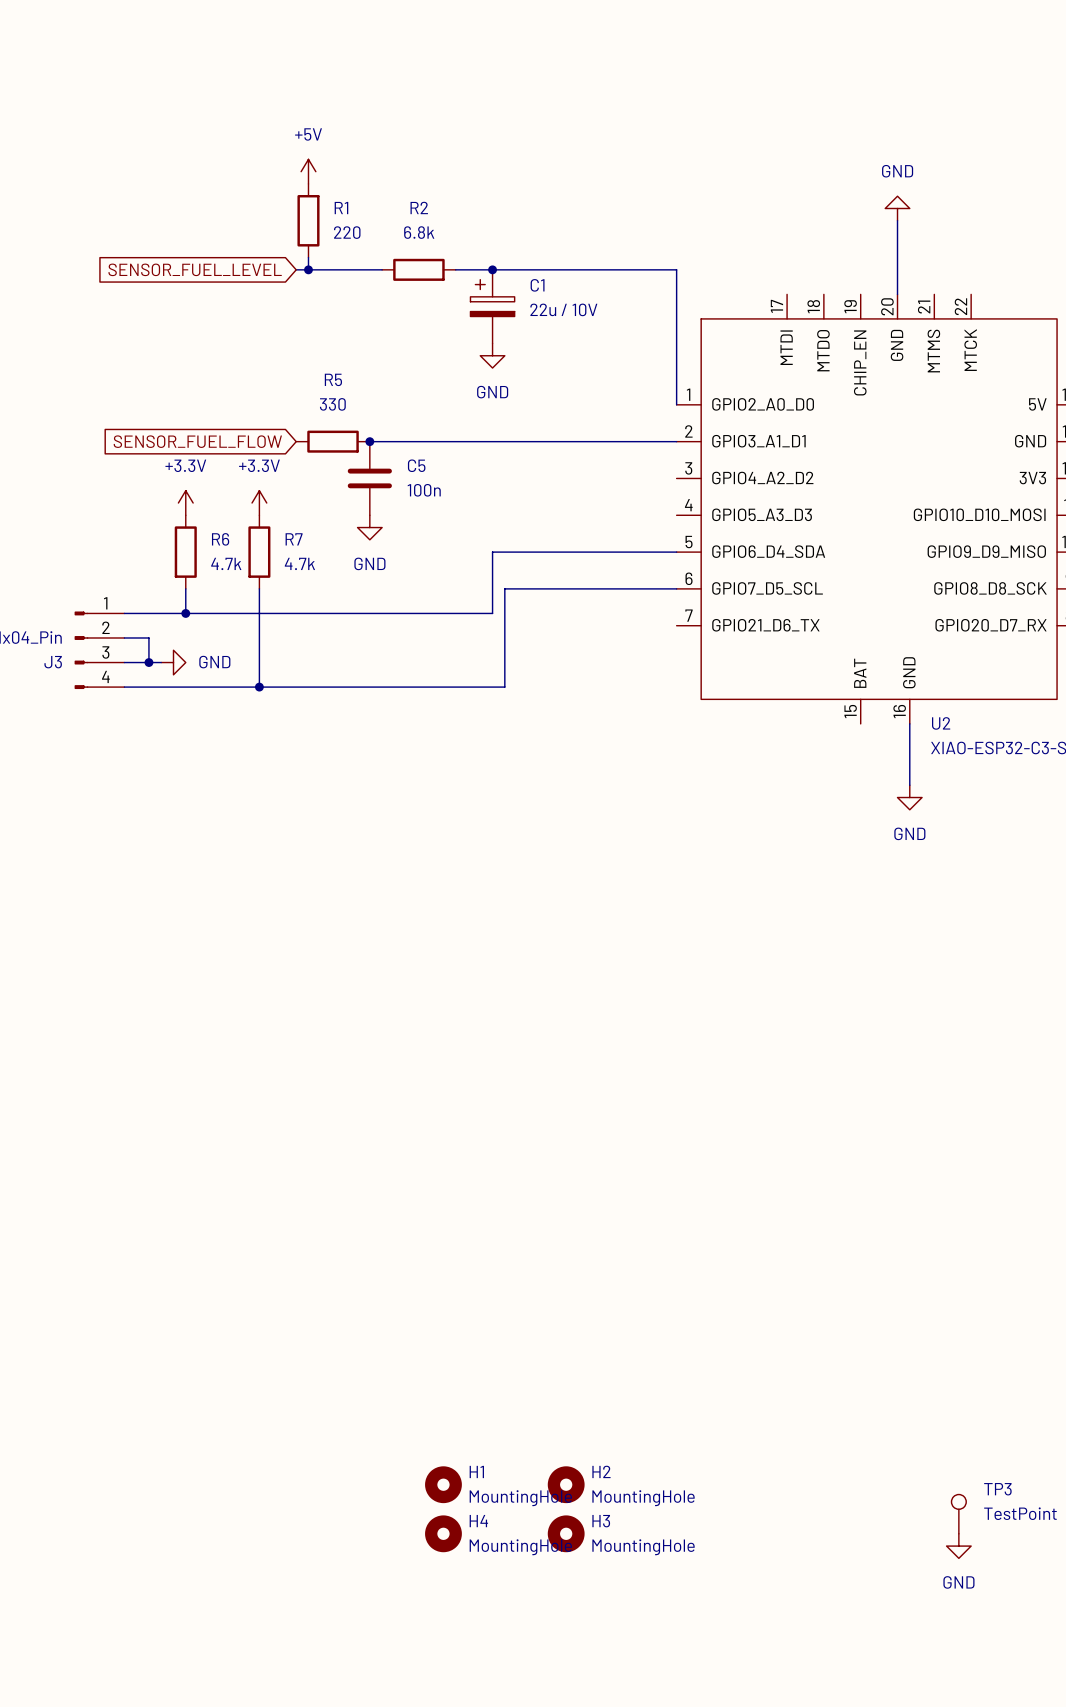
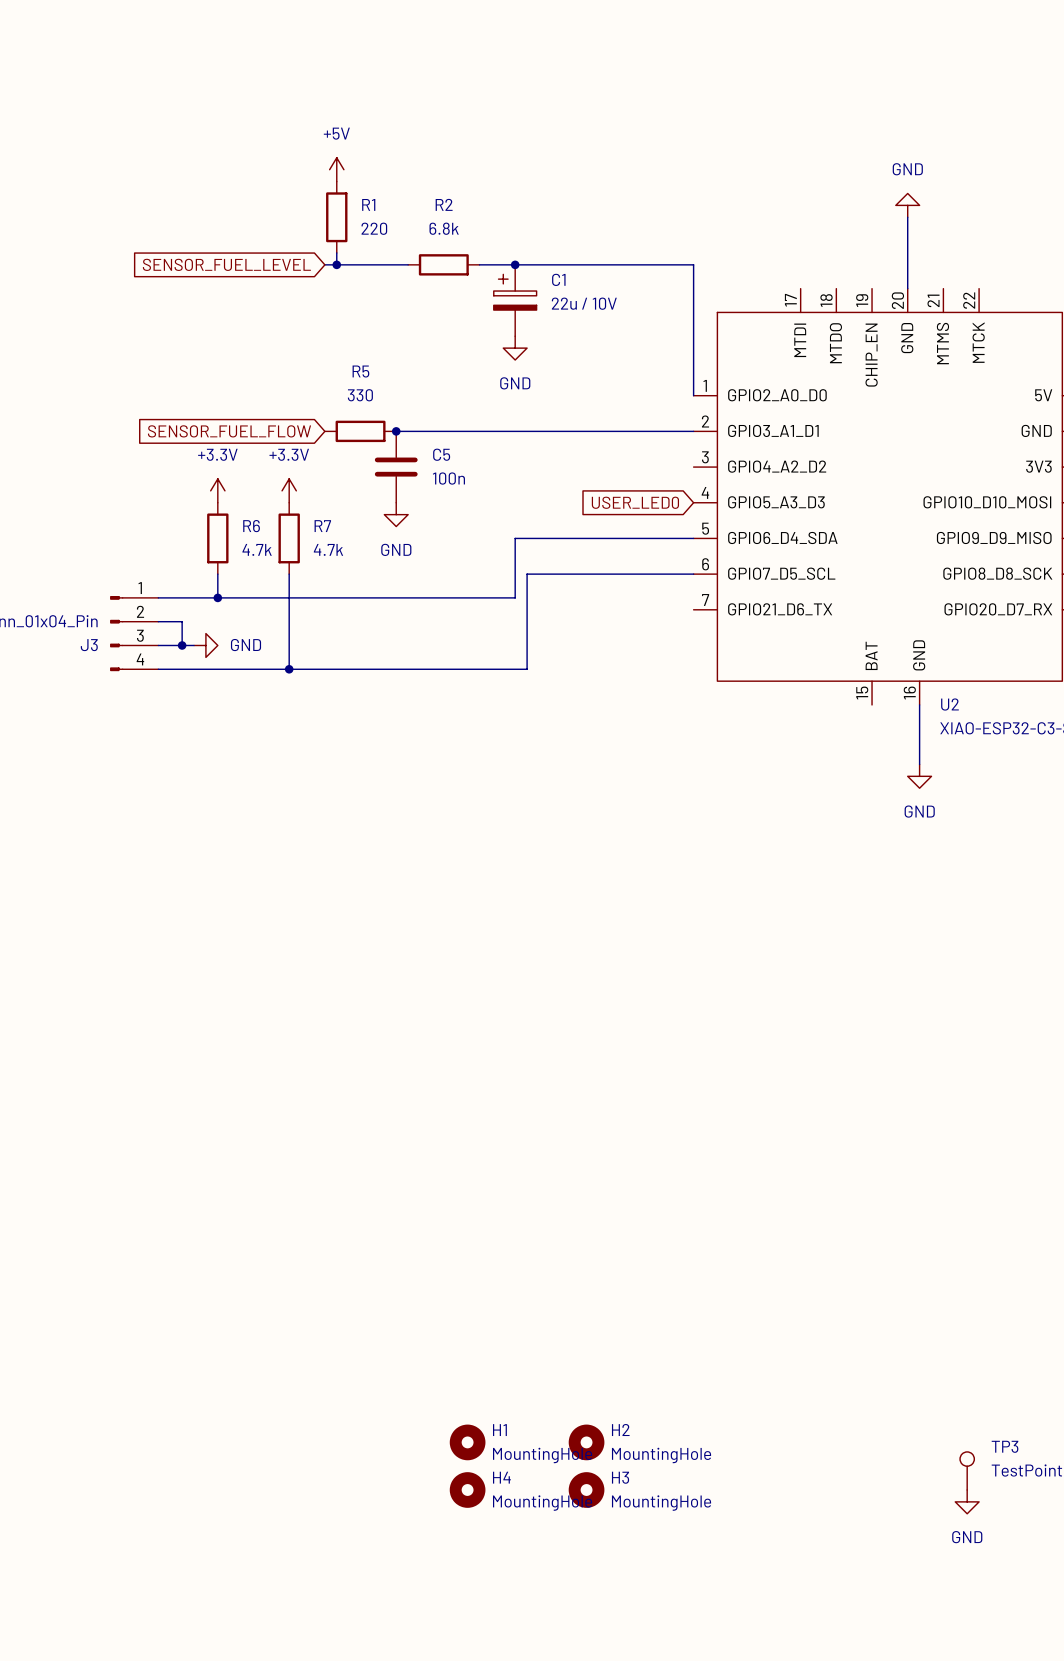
global label: none -> USER_LED0 (635, 502)

